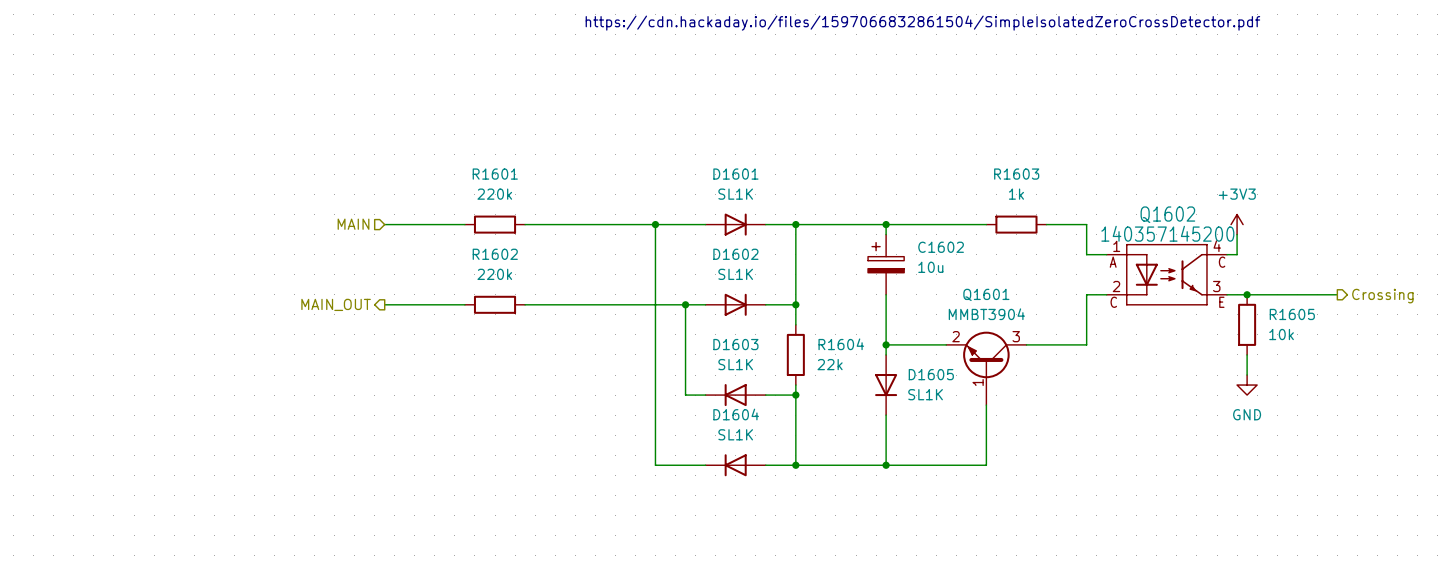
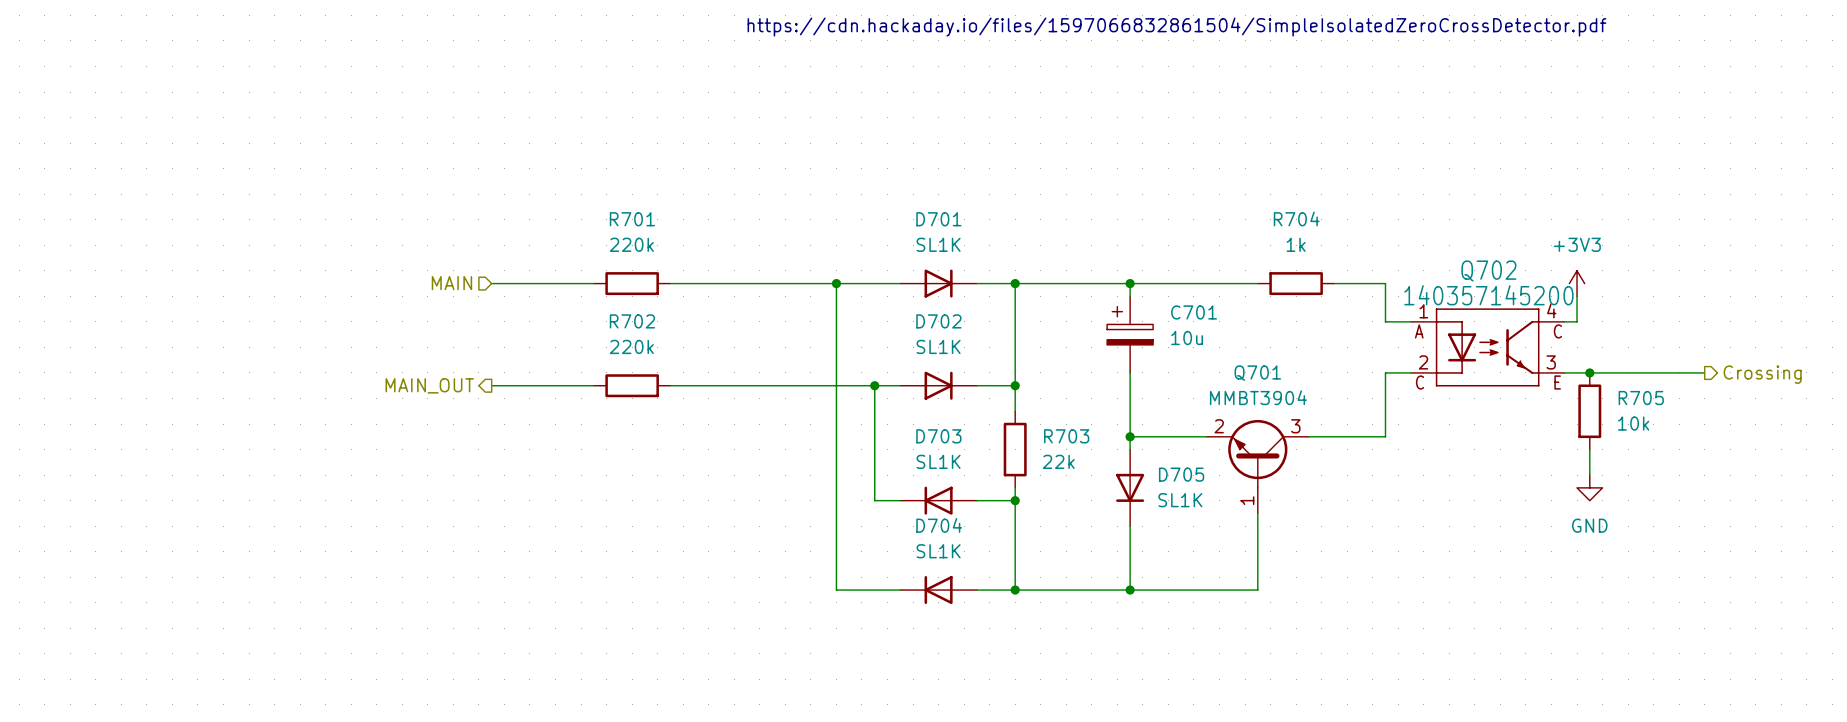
R1601 name: R1601 (495, 174) -> R701 (632, 219)
D1601 name: D1601 (735, 174) -> D701 (938, 219)
R1603 name: R1603 (1016, 174) -> R704 (1296, 218)
Q1602 name: Q1602 (1167, 214) -> Q702 (1488, 271)
C1602 name: C1602 (941, 247) -> C701 (1194, 312)
R1602 name: R1602 (495, 254) -> R702 (632, 321)
D1602 name: D1602 (735, 254) -> D702 (938, 321)
R1605 name: R1605 (1292, 314) -> R705 (1641, 398)
D1603 name: D1603 (735, 344) -> D703 (938, 436)
R1604 name: R1604 (841, 344) -> R703 (1066, 436)
Q1601: MMBT3904 (986, 368) -> none
Q701: none -> MMBT3904 (1257, 466)
D1605 name: D1605 (931, 374) -> D705 (1181, 474)
D1604 name: D1604 (736, 414) -> D704 (939, 525)

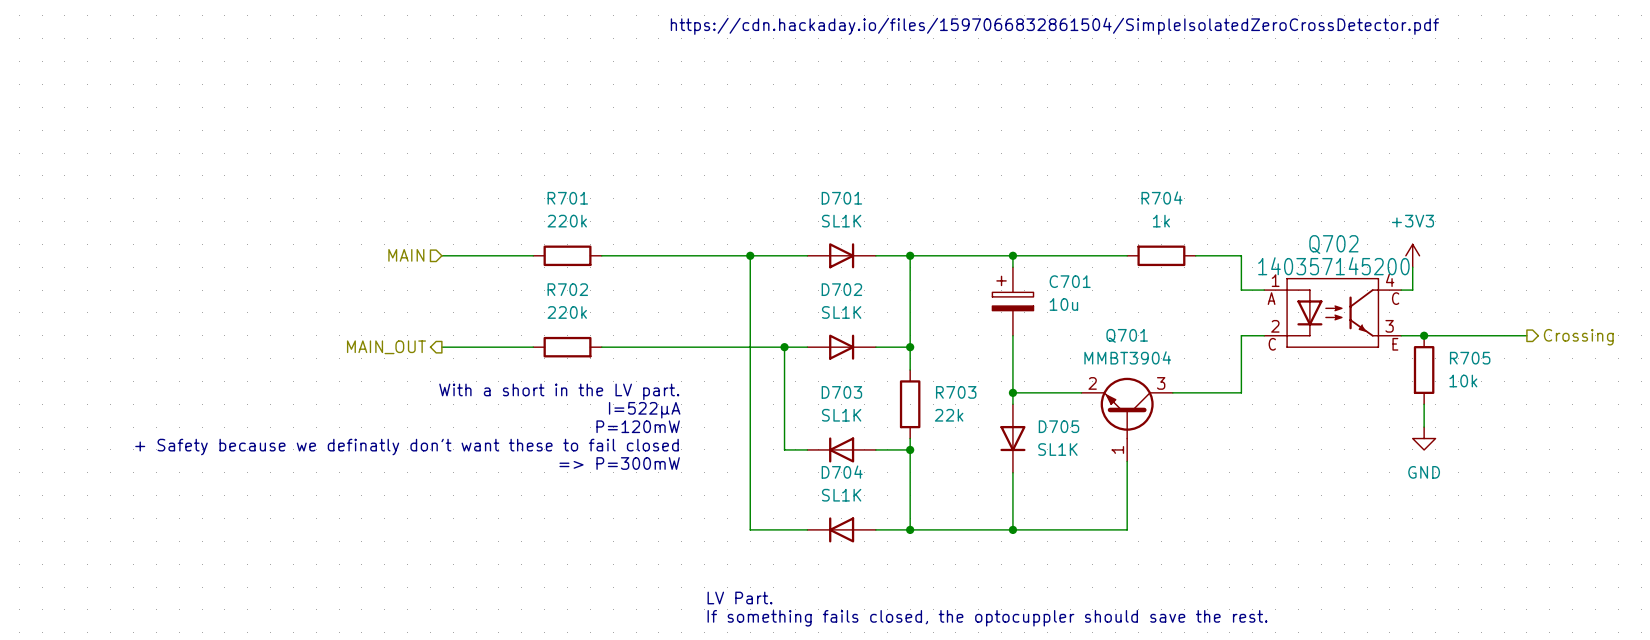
text: none -> With a short in the LV part. (559, 391)
text: none -> I=522μA (644, 410)
text: none -> P=120mW (638, 426)
text: none -> + Safety because we definatly don't want these to fail closed (406, 447)
text: none -> => P=300mW (619, 463)
text: none -> LV Part. (740, 597)
text: none -> If something fails closed, the optocuppler should save the rest. (987, 618)

